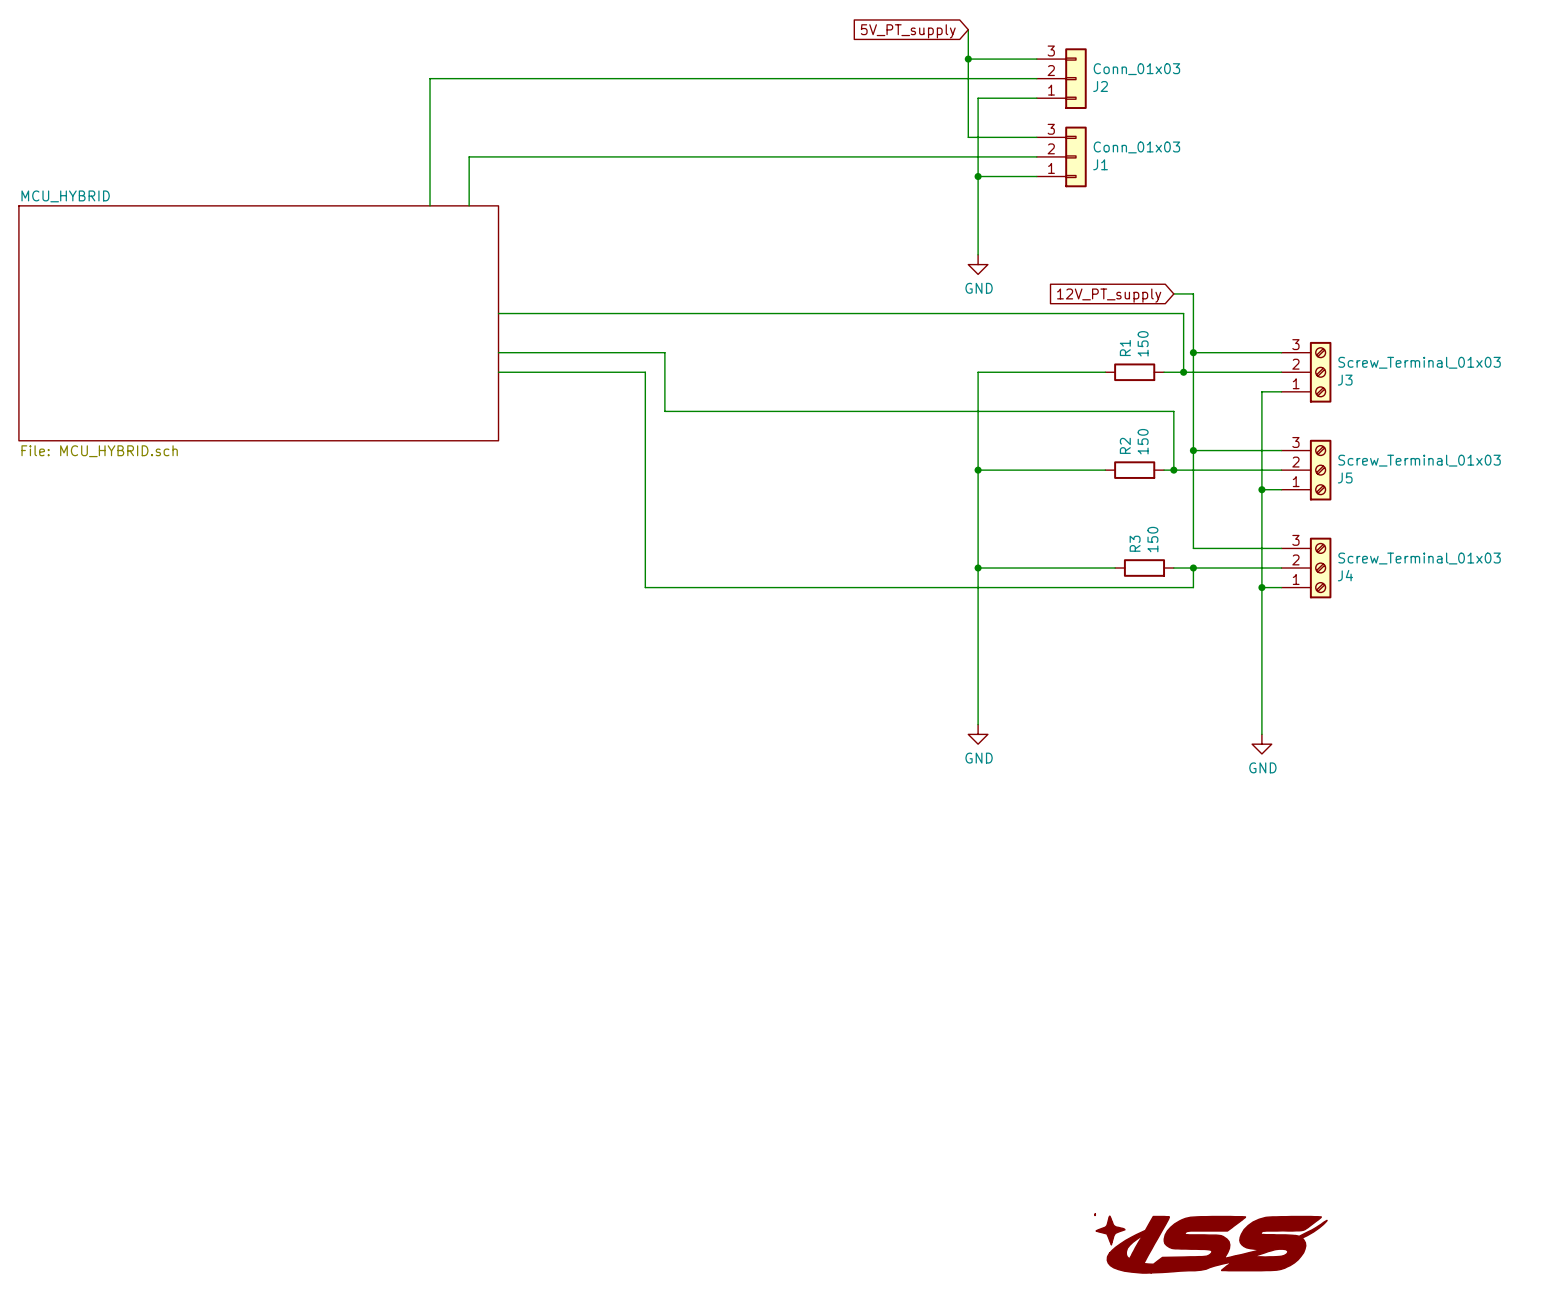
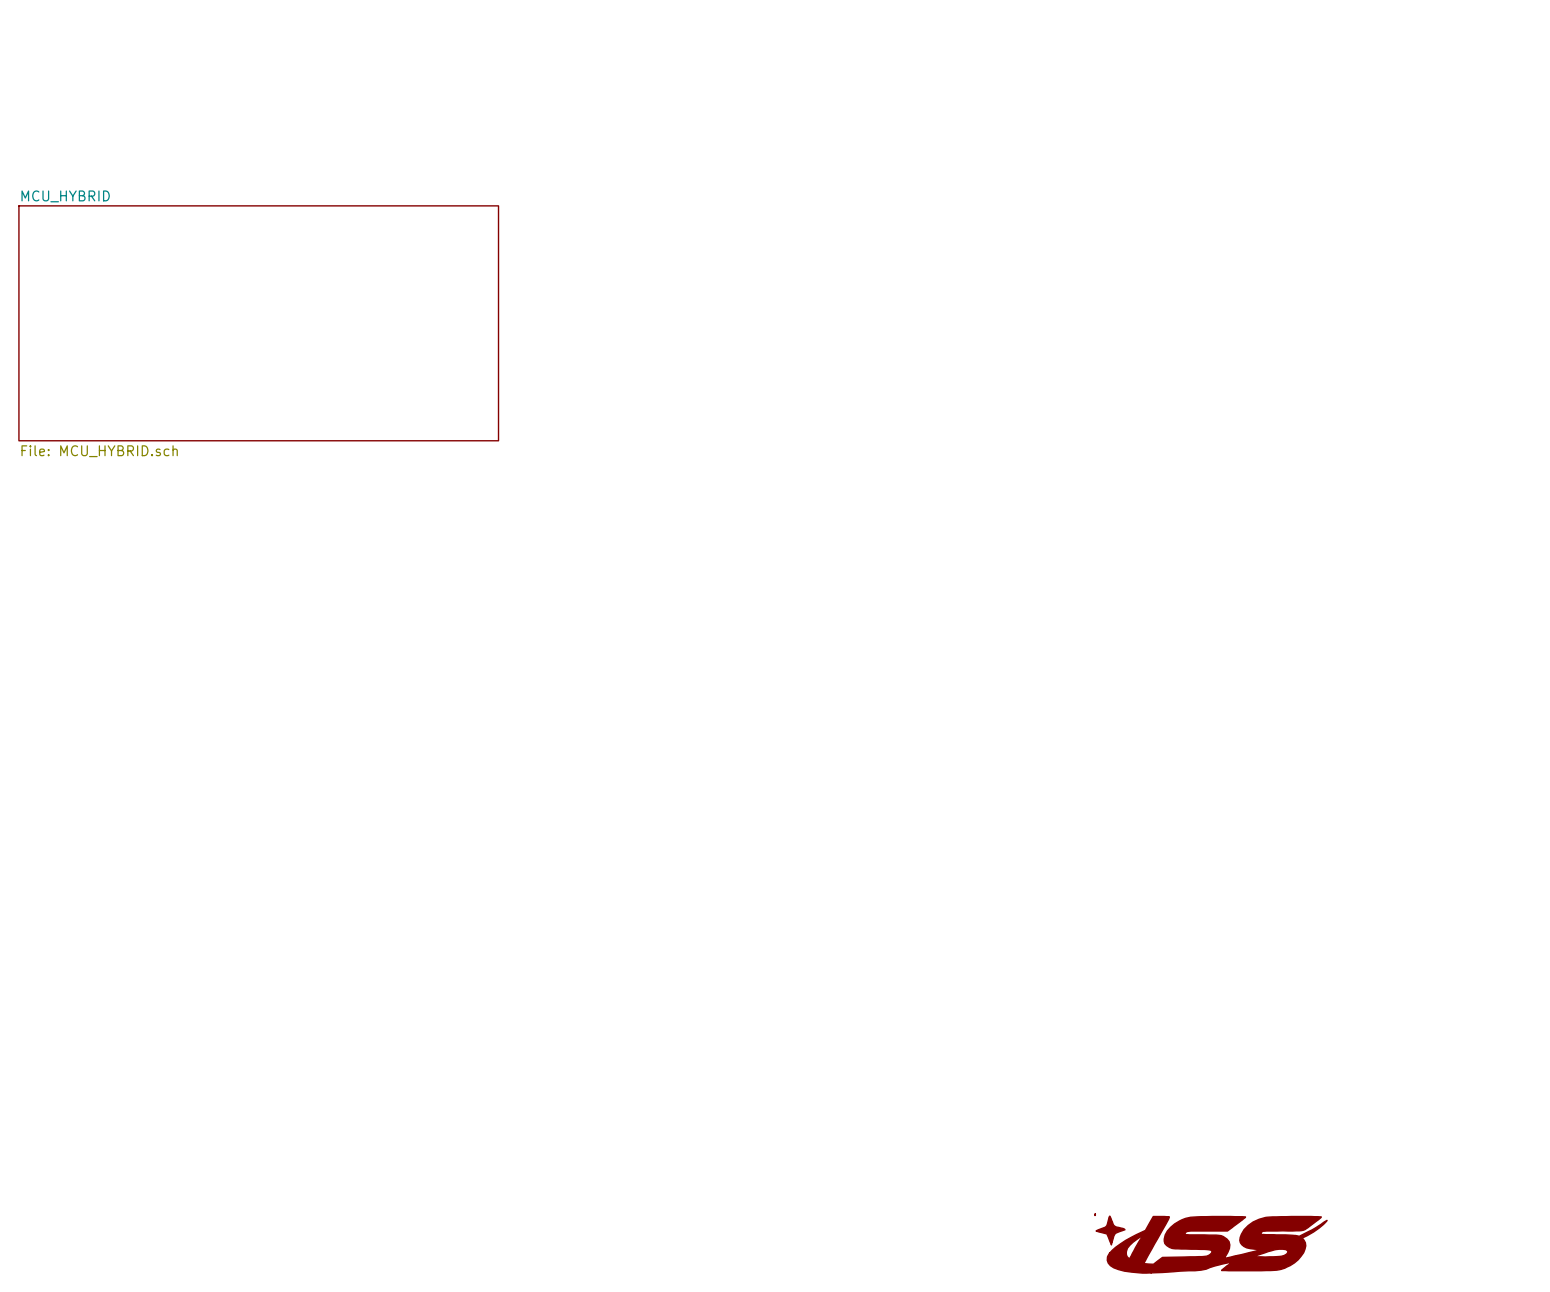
wire: (968, 29) (968, 137) (1036, 137) -> none
global label: 5V_PT_supply (908, 31) -> none
wire: (968, 59) (1036, 59) -> none
junction: (968, 59) -> none
wire: (1036, 78) (430, 78) (430, 205) -> none
J2: Conn_01x03 (1061, 78) -> none
wire: (1036, 98) (978, 98) (978, 254) -> none
wire: (1036, 156) (469, 156) (469, 205) -> none
J1: Conn_01x03 (1061, 156) -> none
wire: (978, 176) (1036, 176) -> none
junction: (978, 176) -> none
power symbol: GND (978, 264) -> none
wire: (1173, 293) (1193, 293) (1193, 548) (1281, 548) -> none
global label: 12V_PT_supply (1109, 295) -> none
wire: (498, 313) (1183, 313) (1183, 372) -> none
wire: (498, 352) (664, 352) (664, 411) (1173, 411) (1173, 470) -> none
wire: (1193, 352) (1281, 352) -> none
junction: (1193, 352) -> none
wire: (498, 372) (645, 372) (645, 587) (1193, 587) (1193, 568) -> none
wire: (1105, 372) (978, 372) (978, 724) -> none
R1: 150 (1134, 372) -> none
wire: (1164, 372) (1281, 372) -> none
junction: (1183, 372) -> none
J3: Screw_Terminal_01x03 (1306, 372) -> none
wire: (1281, 391) (1261, 391) (1261, 734) -> none
wire: (1193, 450) (1281, 450) -> none
junction: (1193, 450) -> none
wire: (978, 470) (1105, 470) -> none
junction: (978, 470) -> none
R2: 150 (1134, 470) -> none
wire: (1164, 470) (1281, 470) -> none
junction: (1173, 470) -> none
J5: Screw_Terminal_01x03 (1306, 470) -> none
wire: (1261, 489) (1281, 489) -> none
junction: (1261, 489) -> none
wire: (978, 568) (1115, 568) -> none
junction: (978, 568) -> none
R3: 150 (1144, 568) -> none
wire: (1173, 568) (1281, 568) -> none
junction: (1193, 568) -> none
J4: Screw_Terminal_01x03 (1306, 568) -> none
wire: (1261, 587) (1281, 587) -> none
junction: (1261, 587) -> none
power symbol: GND (978, 734) -> none
power symbol: GND (1261, 744) -> none

